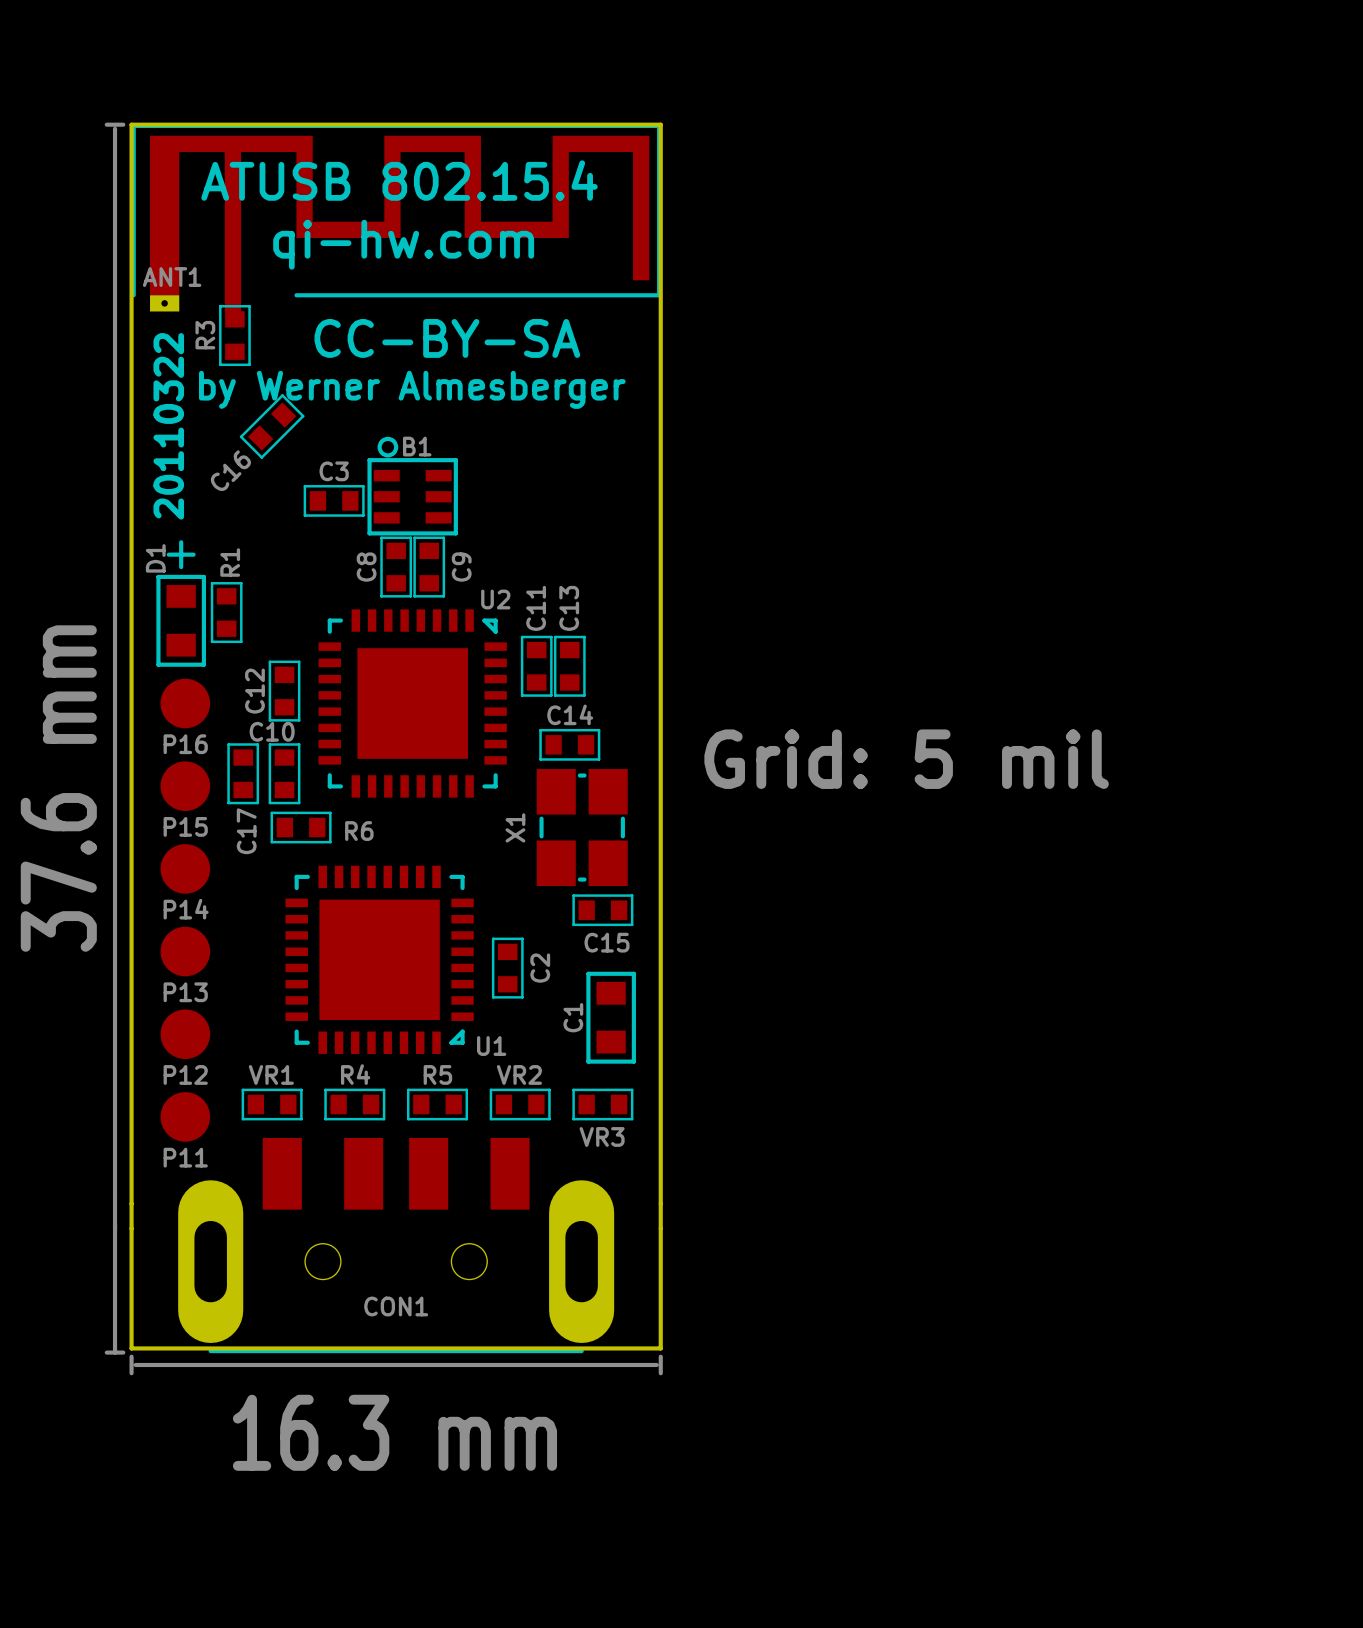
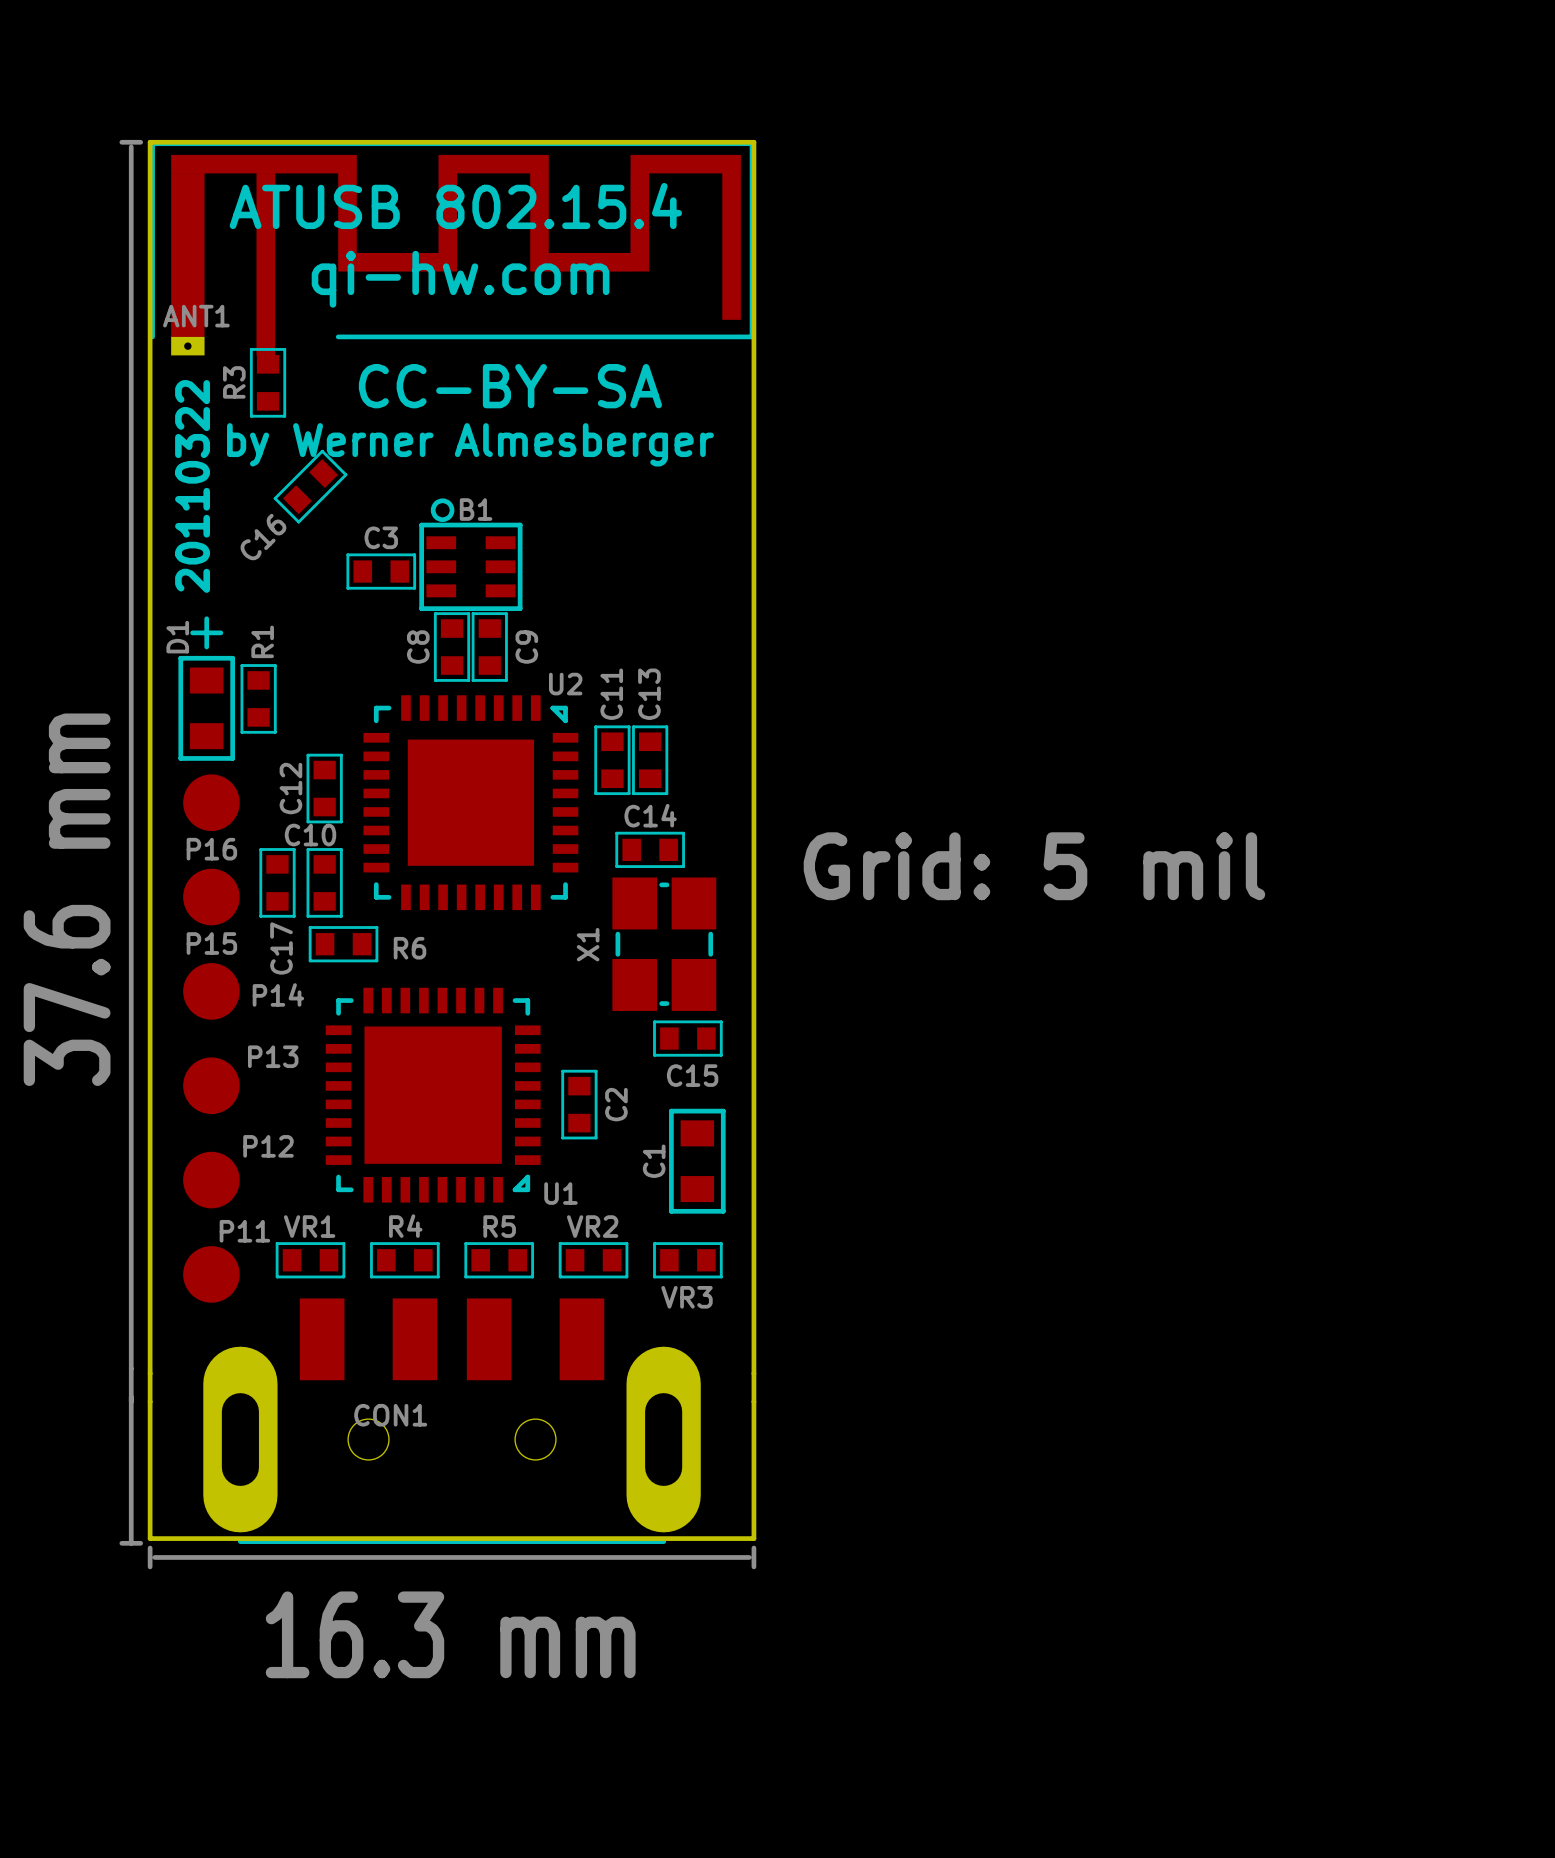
P14 name position: P14 (186, 909) -> P14 (278, 994)
P13 name position: P13 (185, 992) -> P13 (273, 1056)
P12 name position: P12 (185, 1074) -> P12 (268, 1146)
P11 name position: P11 (185, 1157) -> P11 (244, 1231)
CON1 name position: CON1 (396, 1306) -> CON1 (390, 1415)

